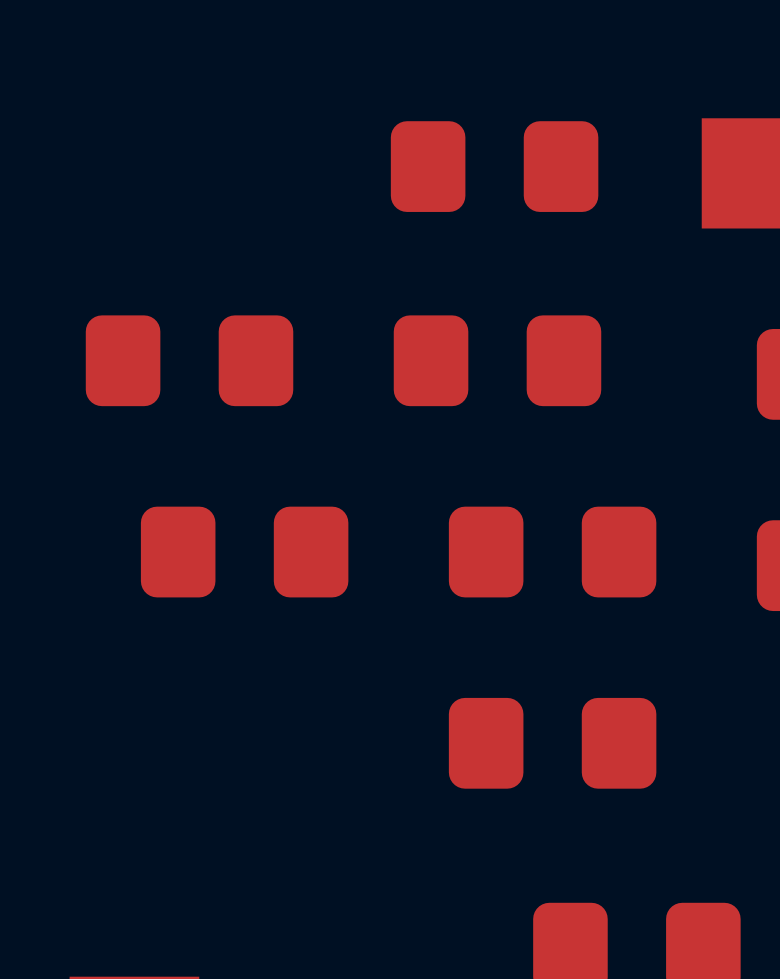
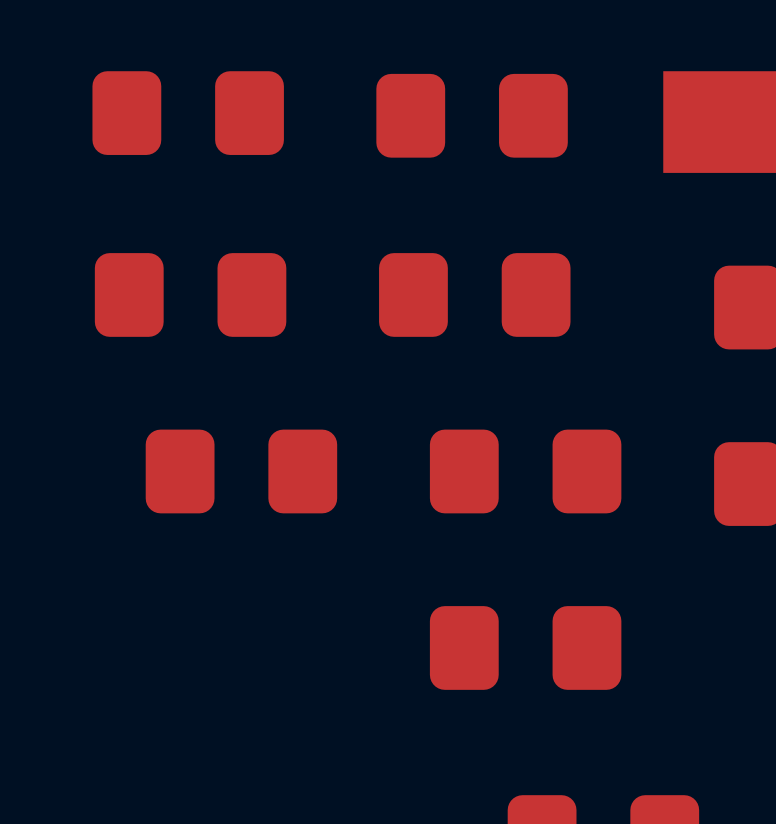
part: none -> (188, 113)

